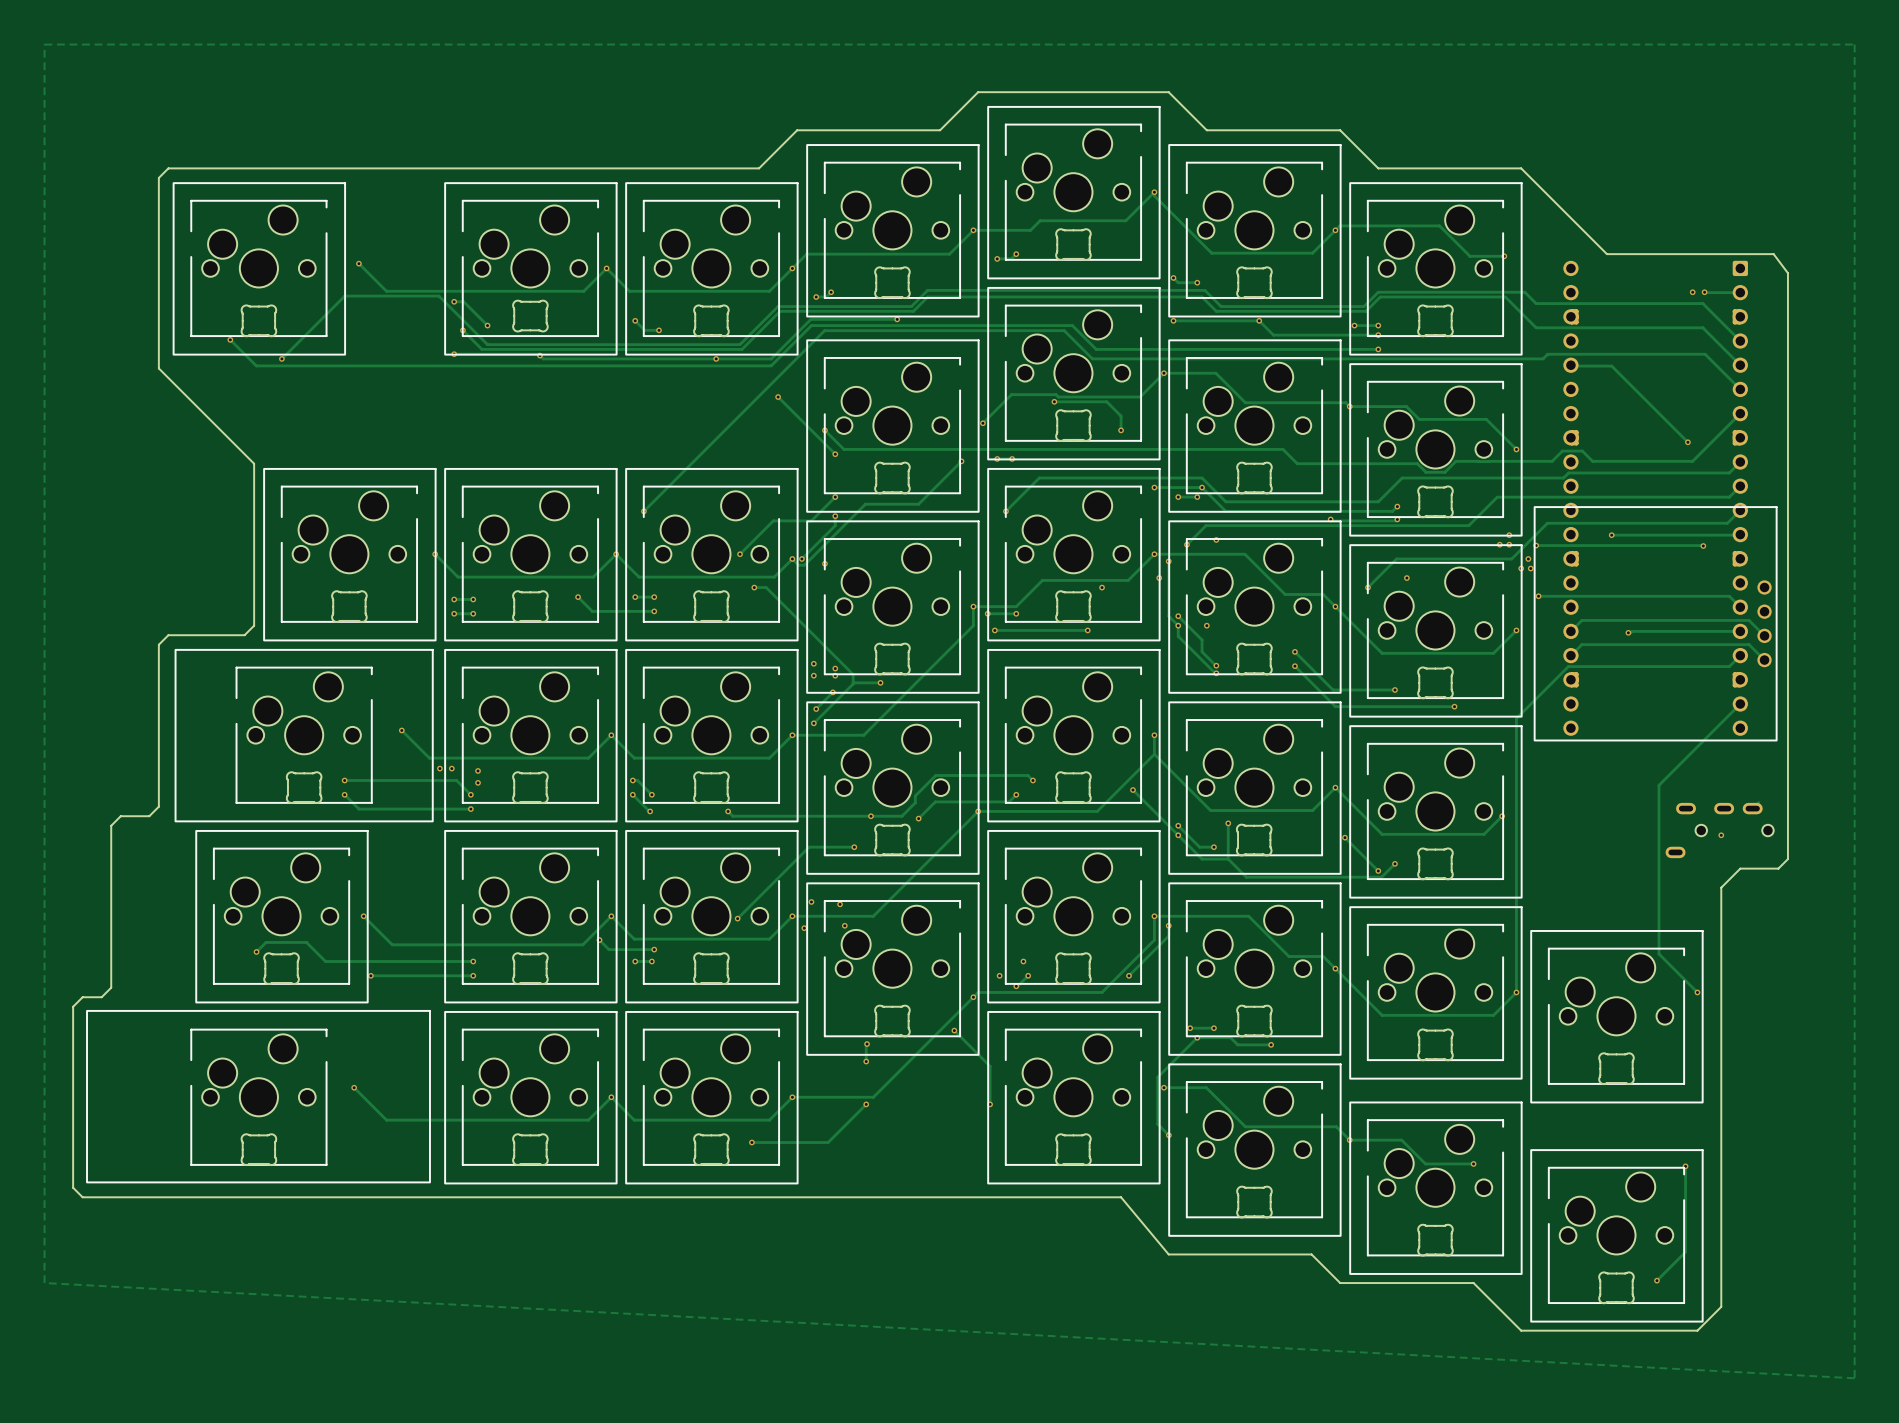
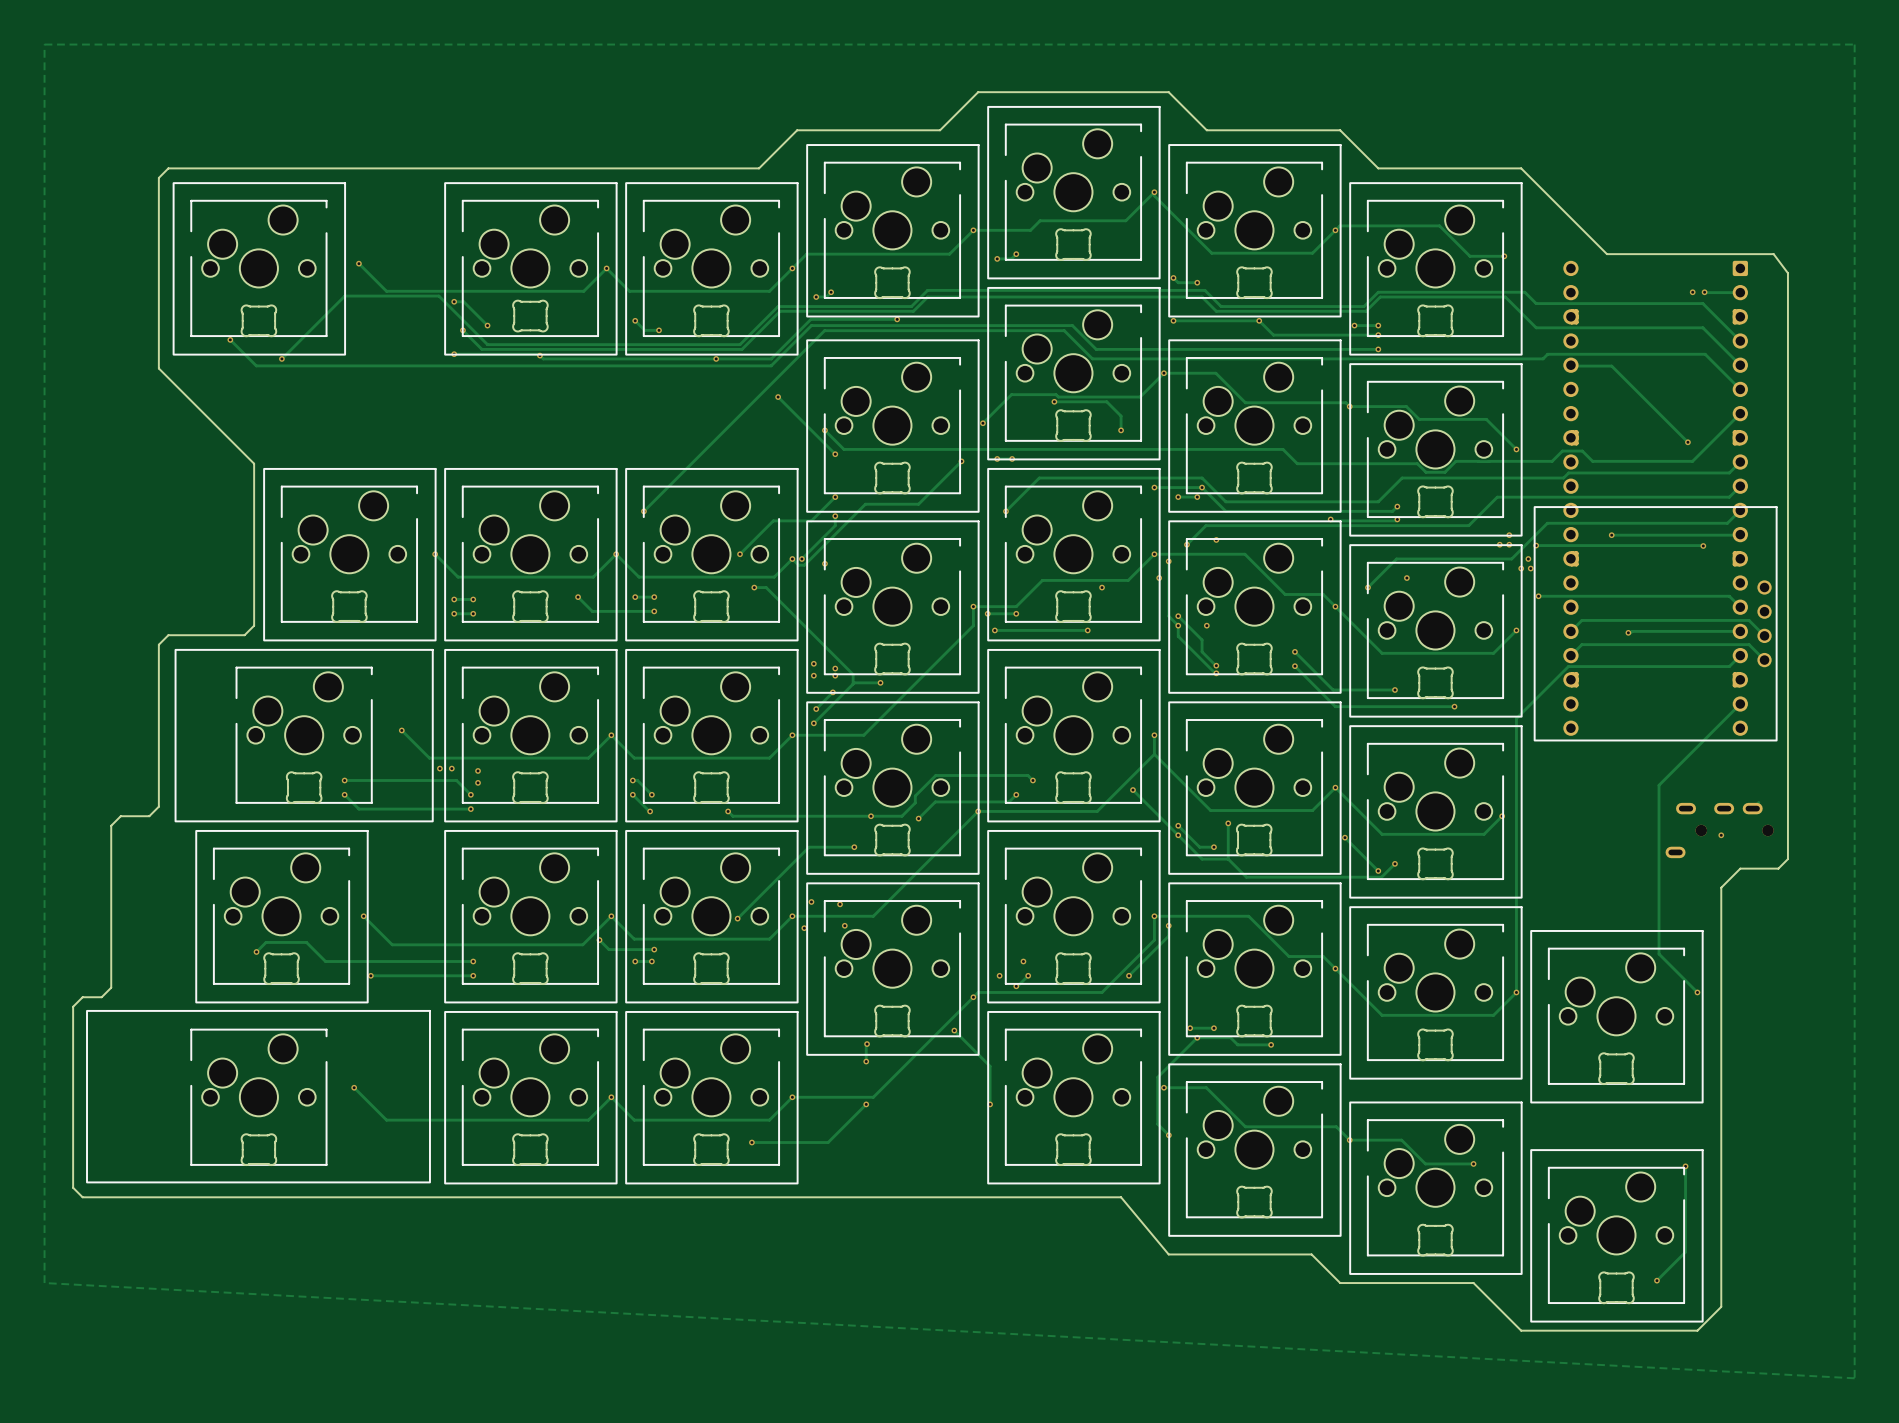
part footprint: [1665, 802, 1774, 859] -> [1665, 802, 1774, 859]

